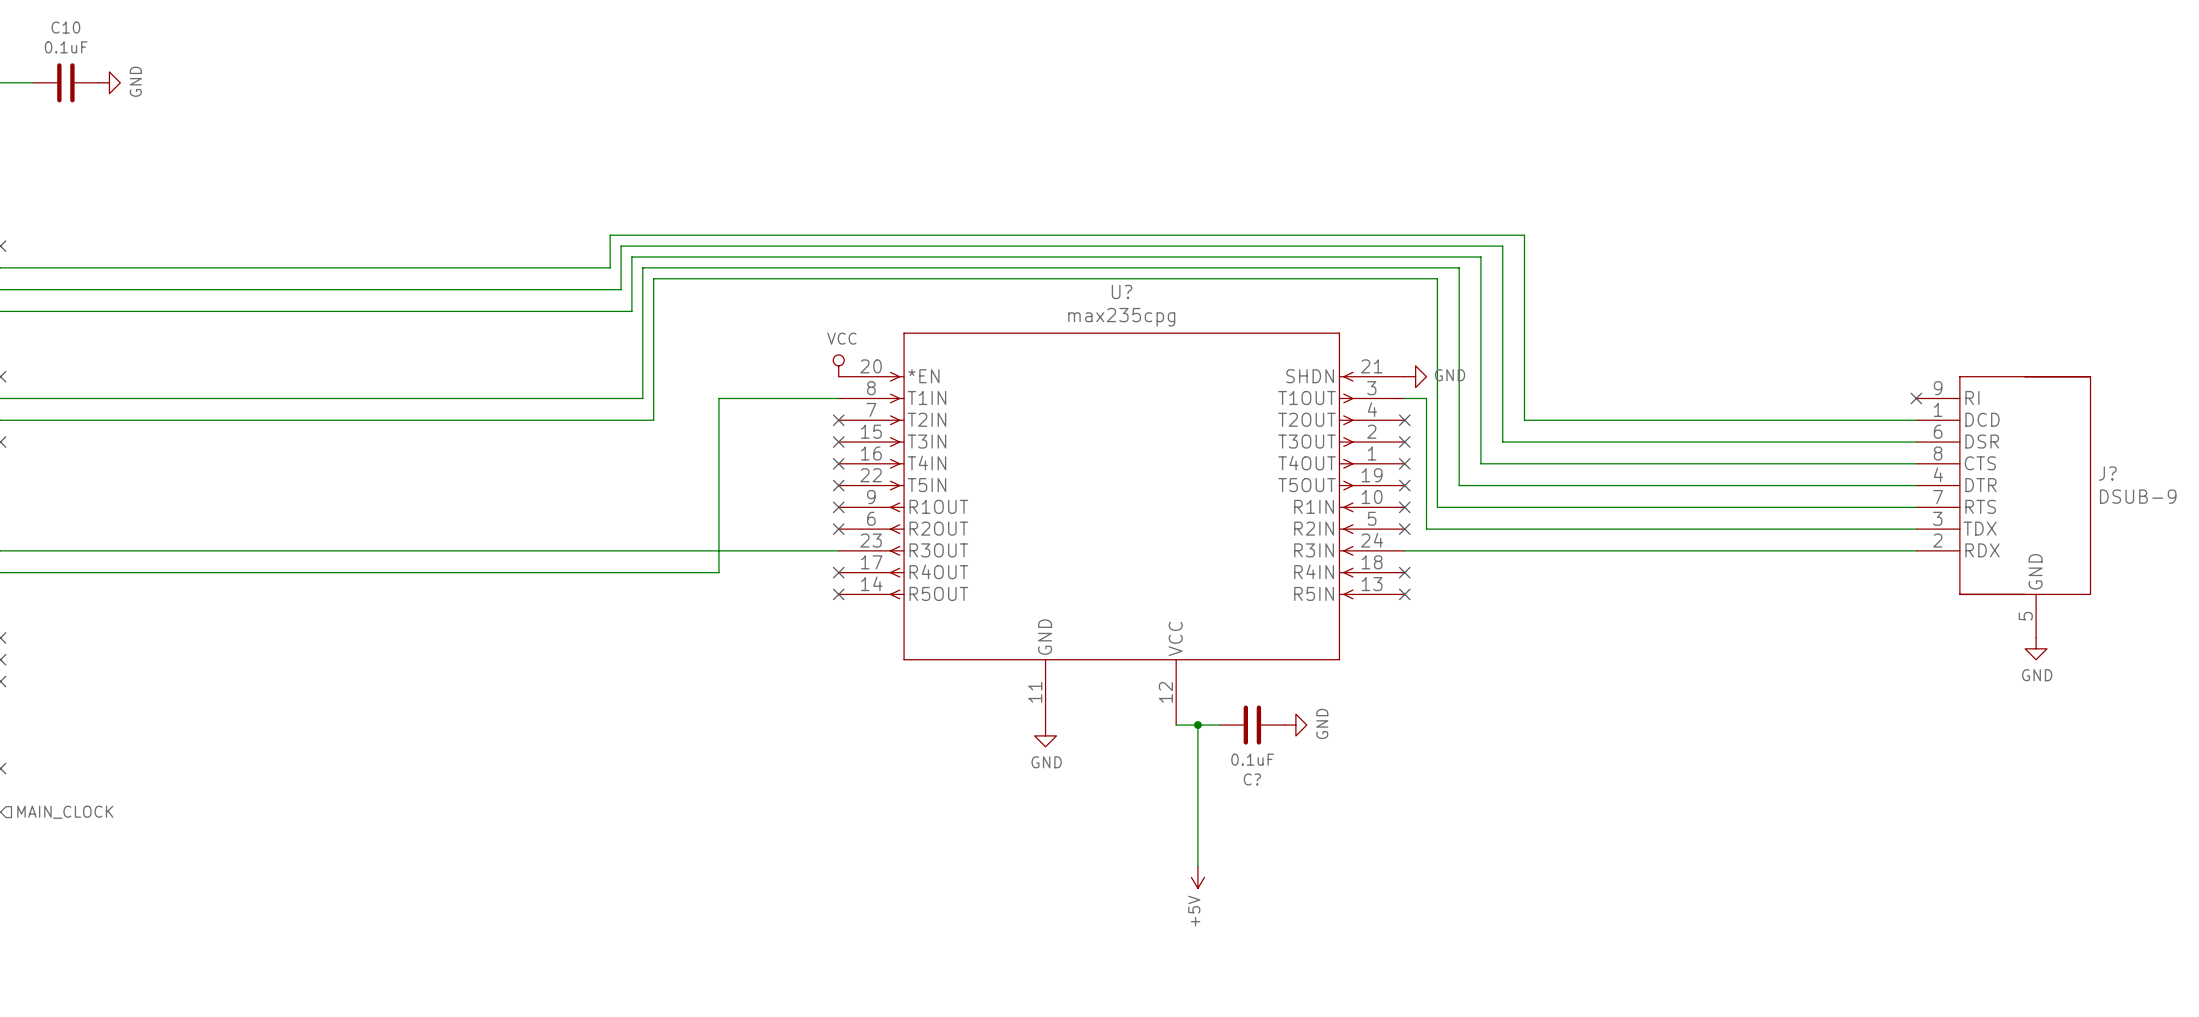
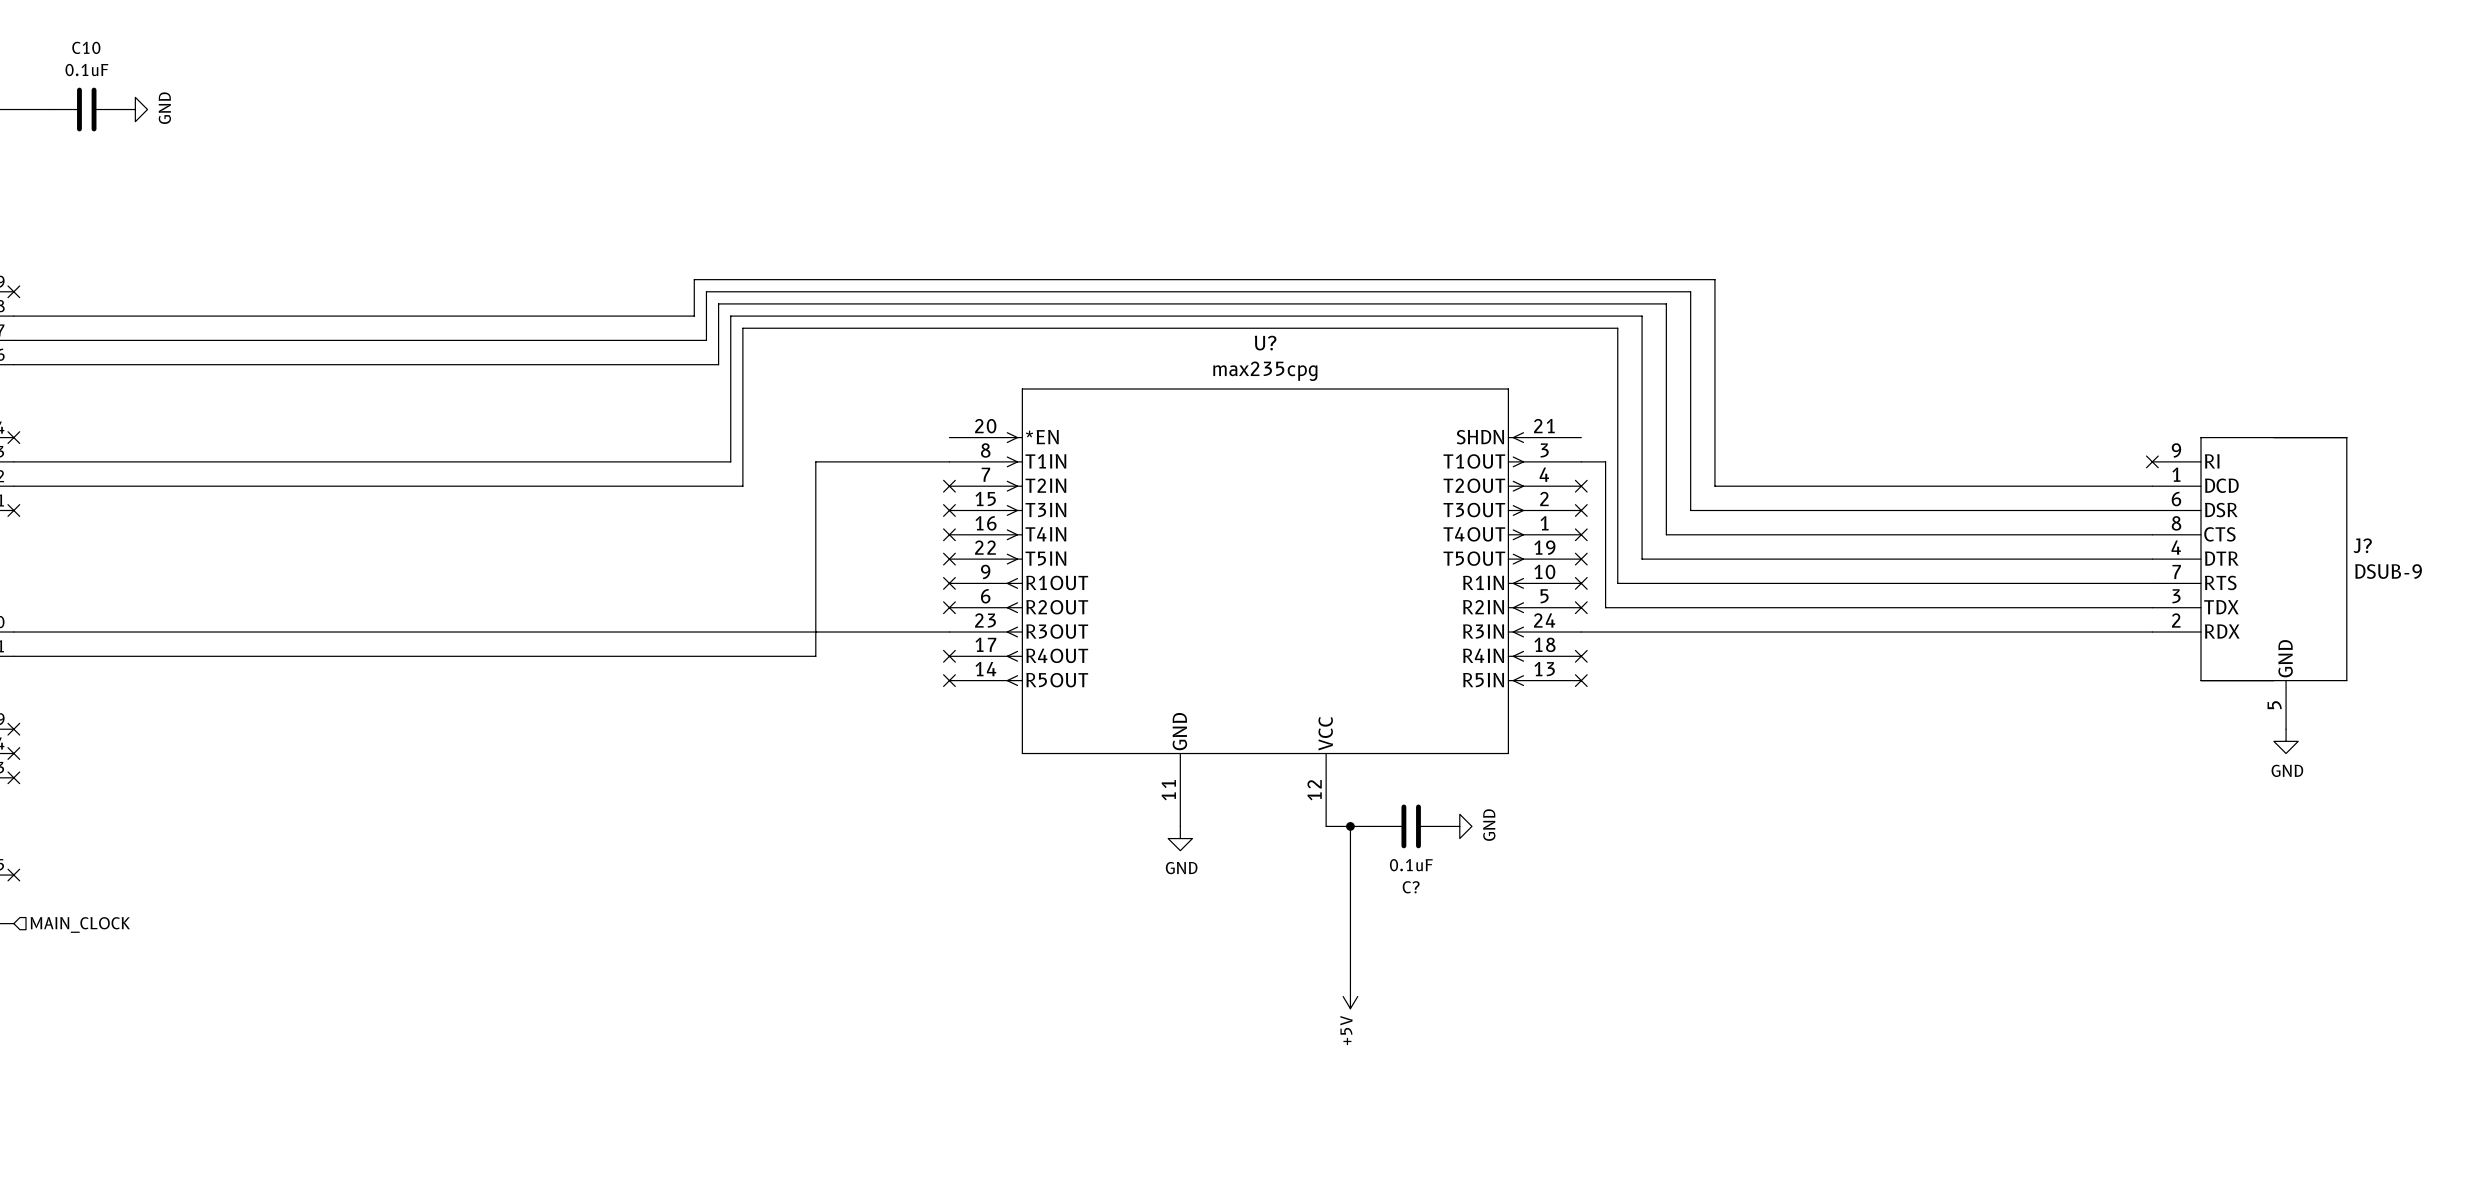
power symbol: VCC (838, 365) -> none
power symbol: GND (1415, 376) -> none

